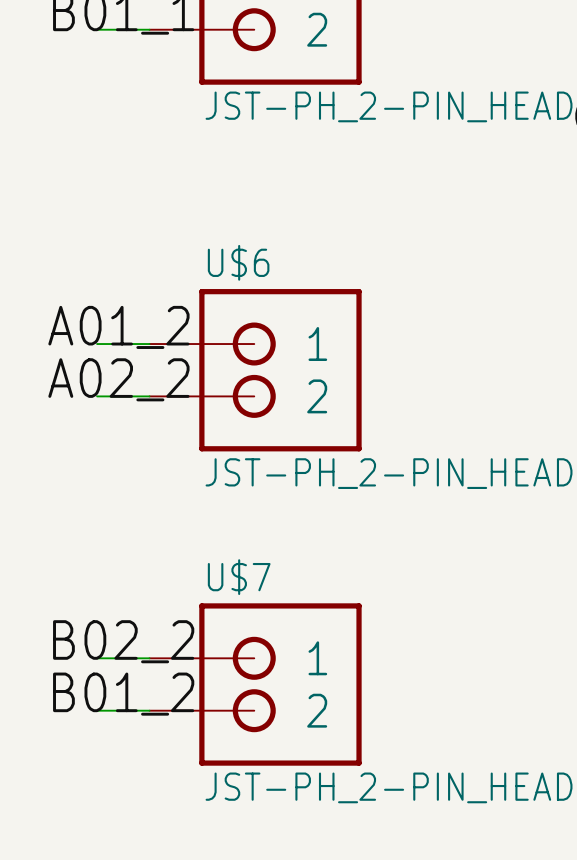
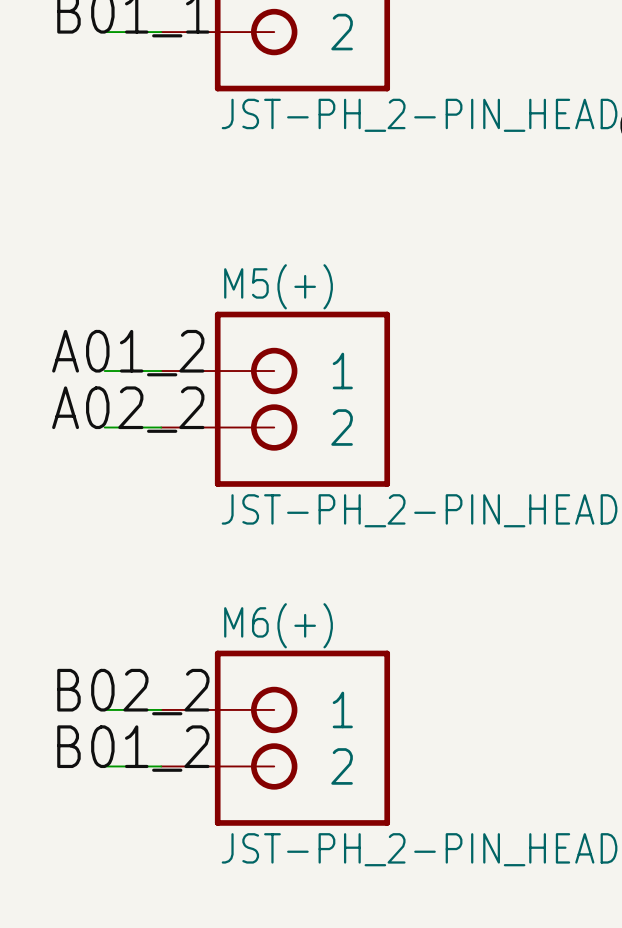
U$6 name: U$6 (238, 262) -> M5(+) (278, 286)
U$7 name: U$7 (239, 577) -> M6(+) (278, 625)

